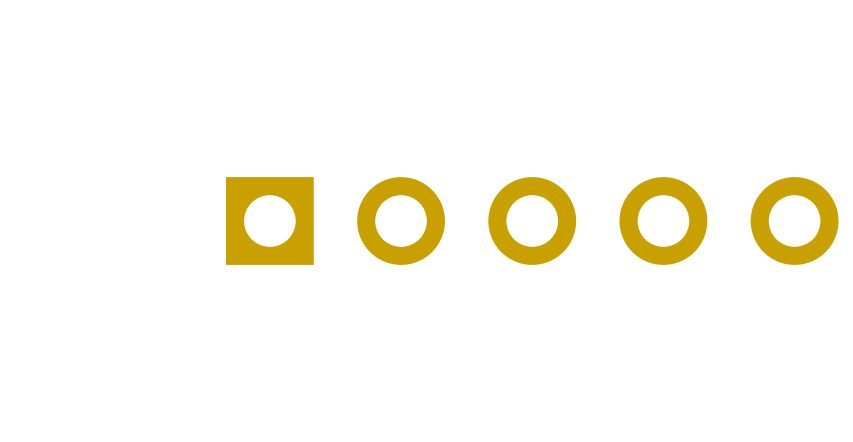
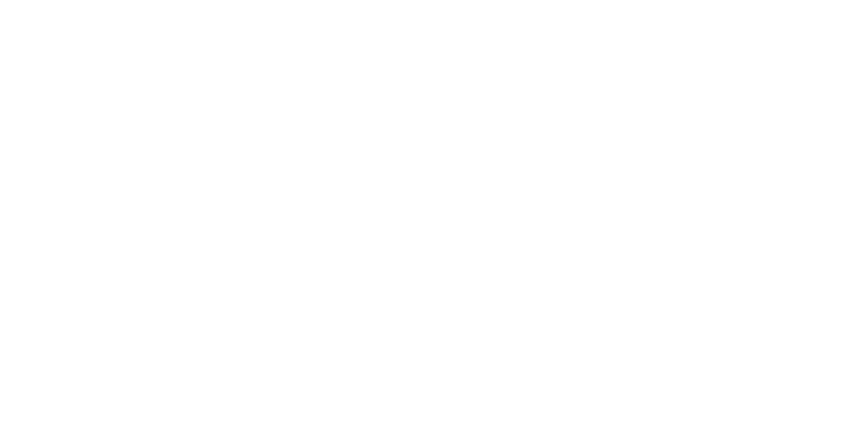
part: (532, 221) -> none

